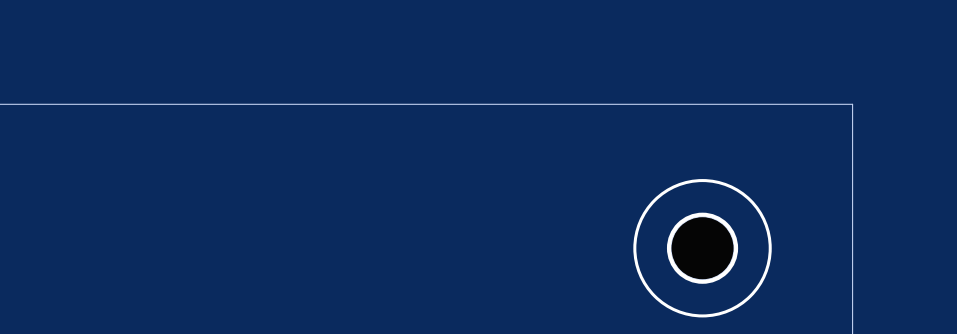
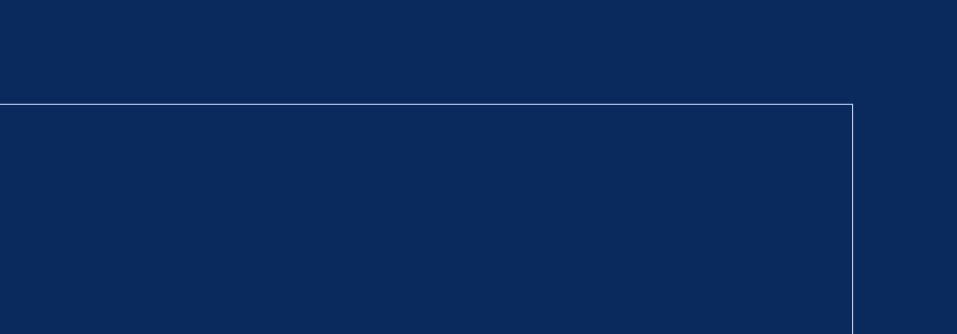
part: (702, 248) -> none

